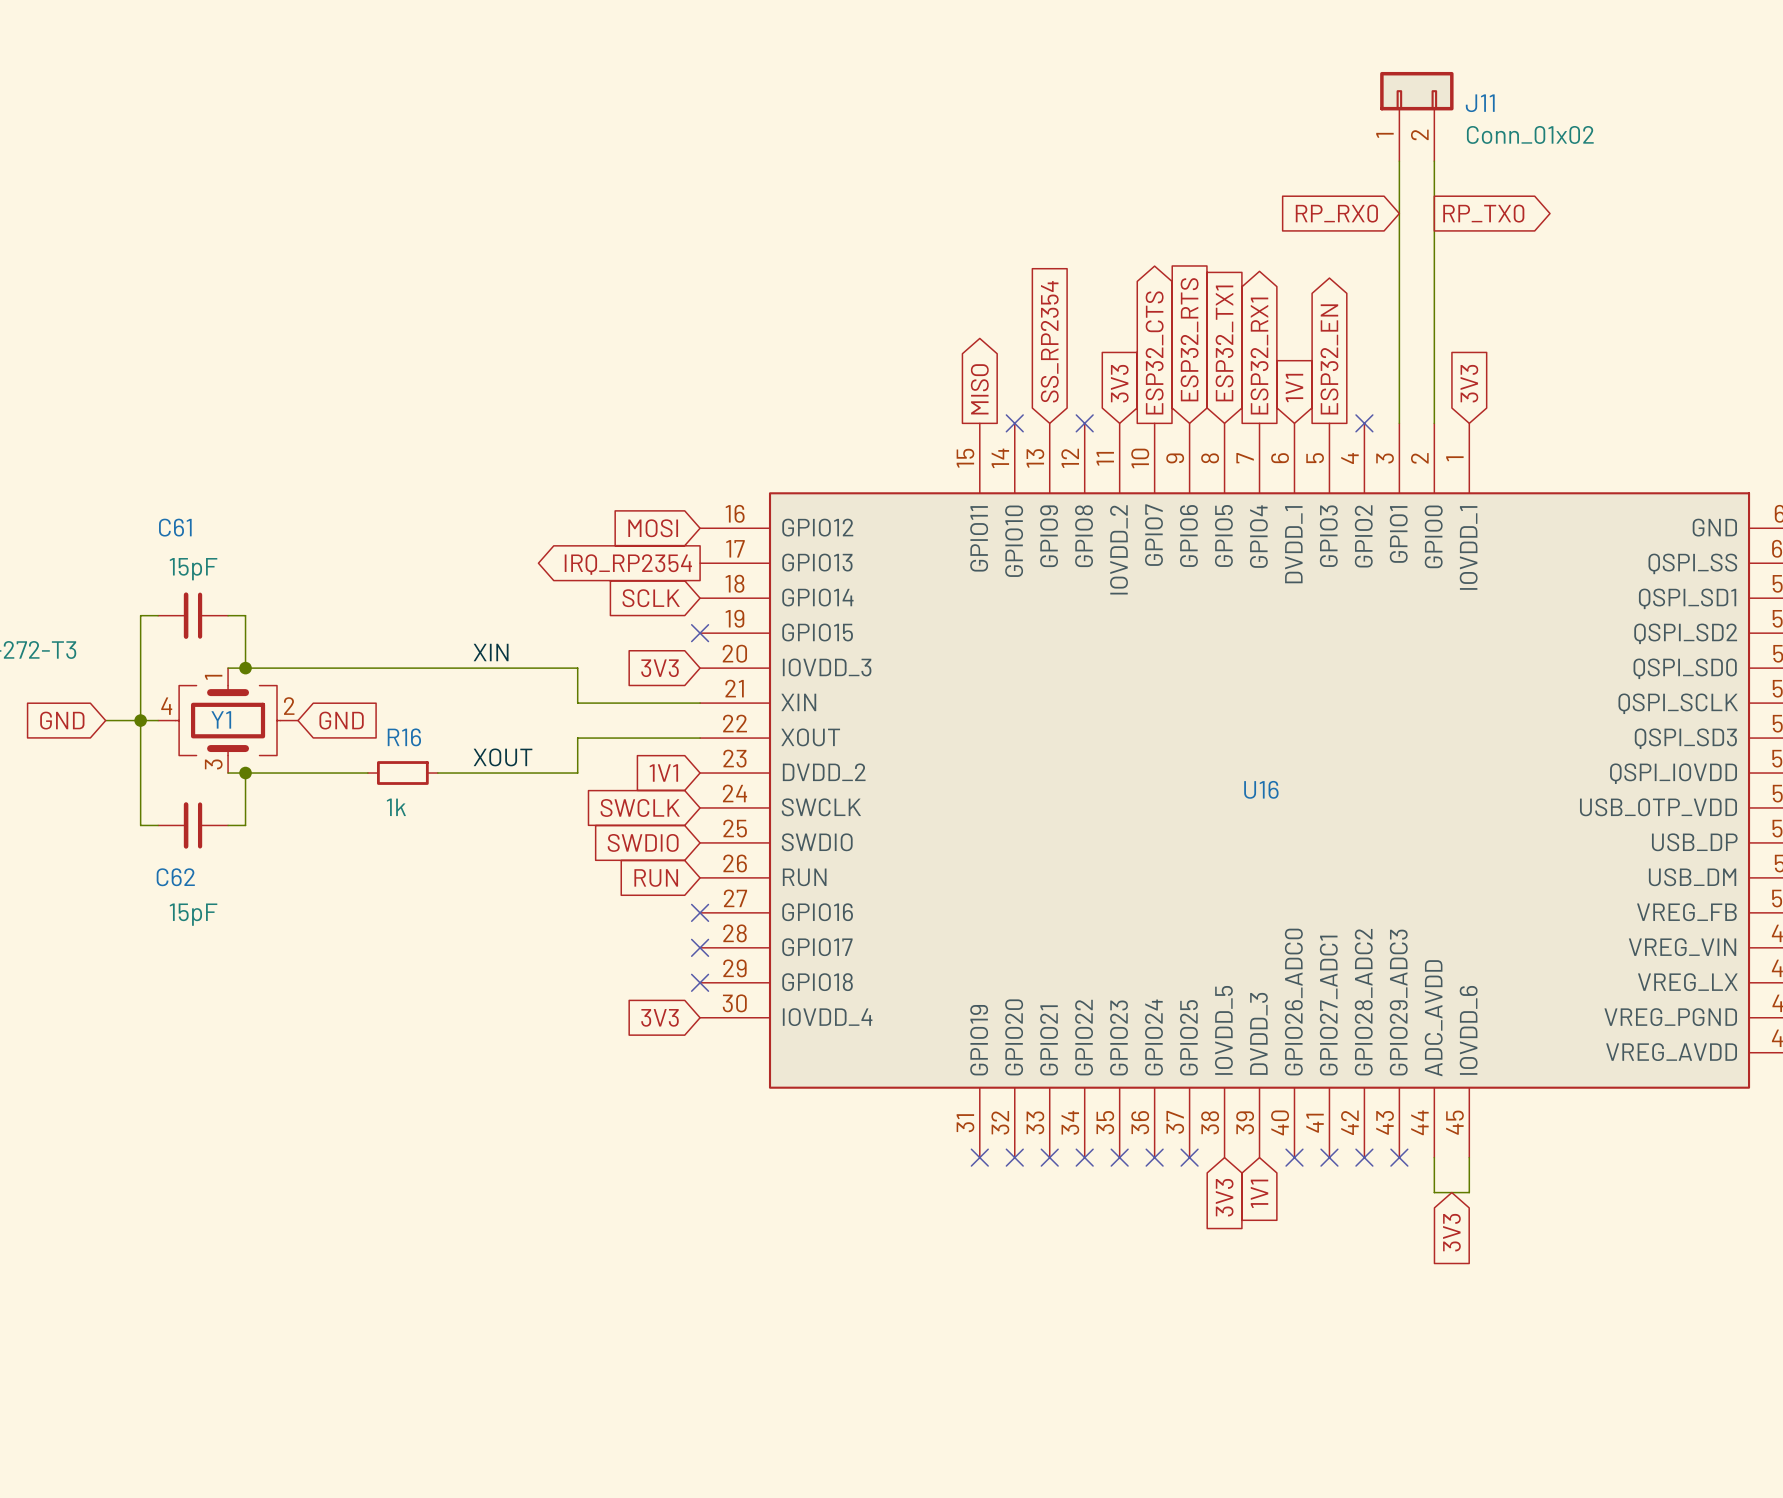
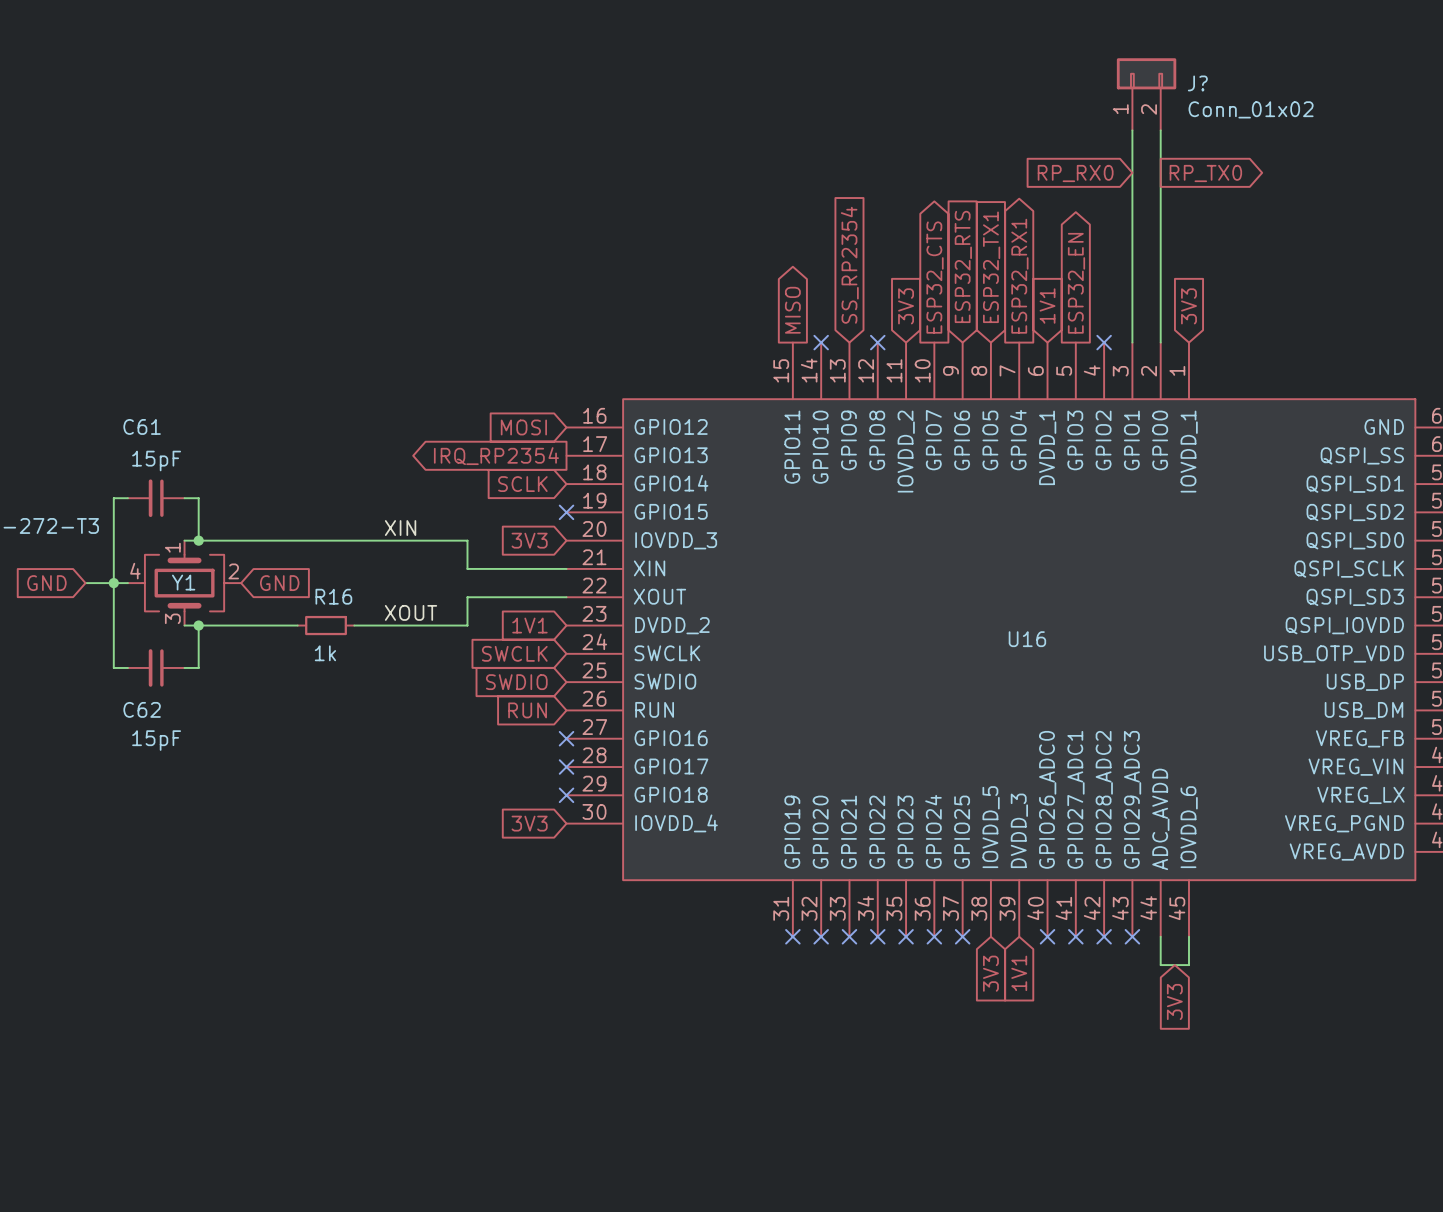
J11 name: J11 (1480, 103) -> J? (1197, 83)

